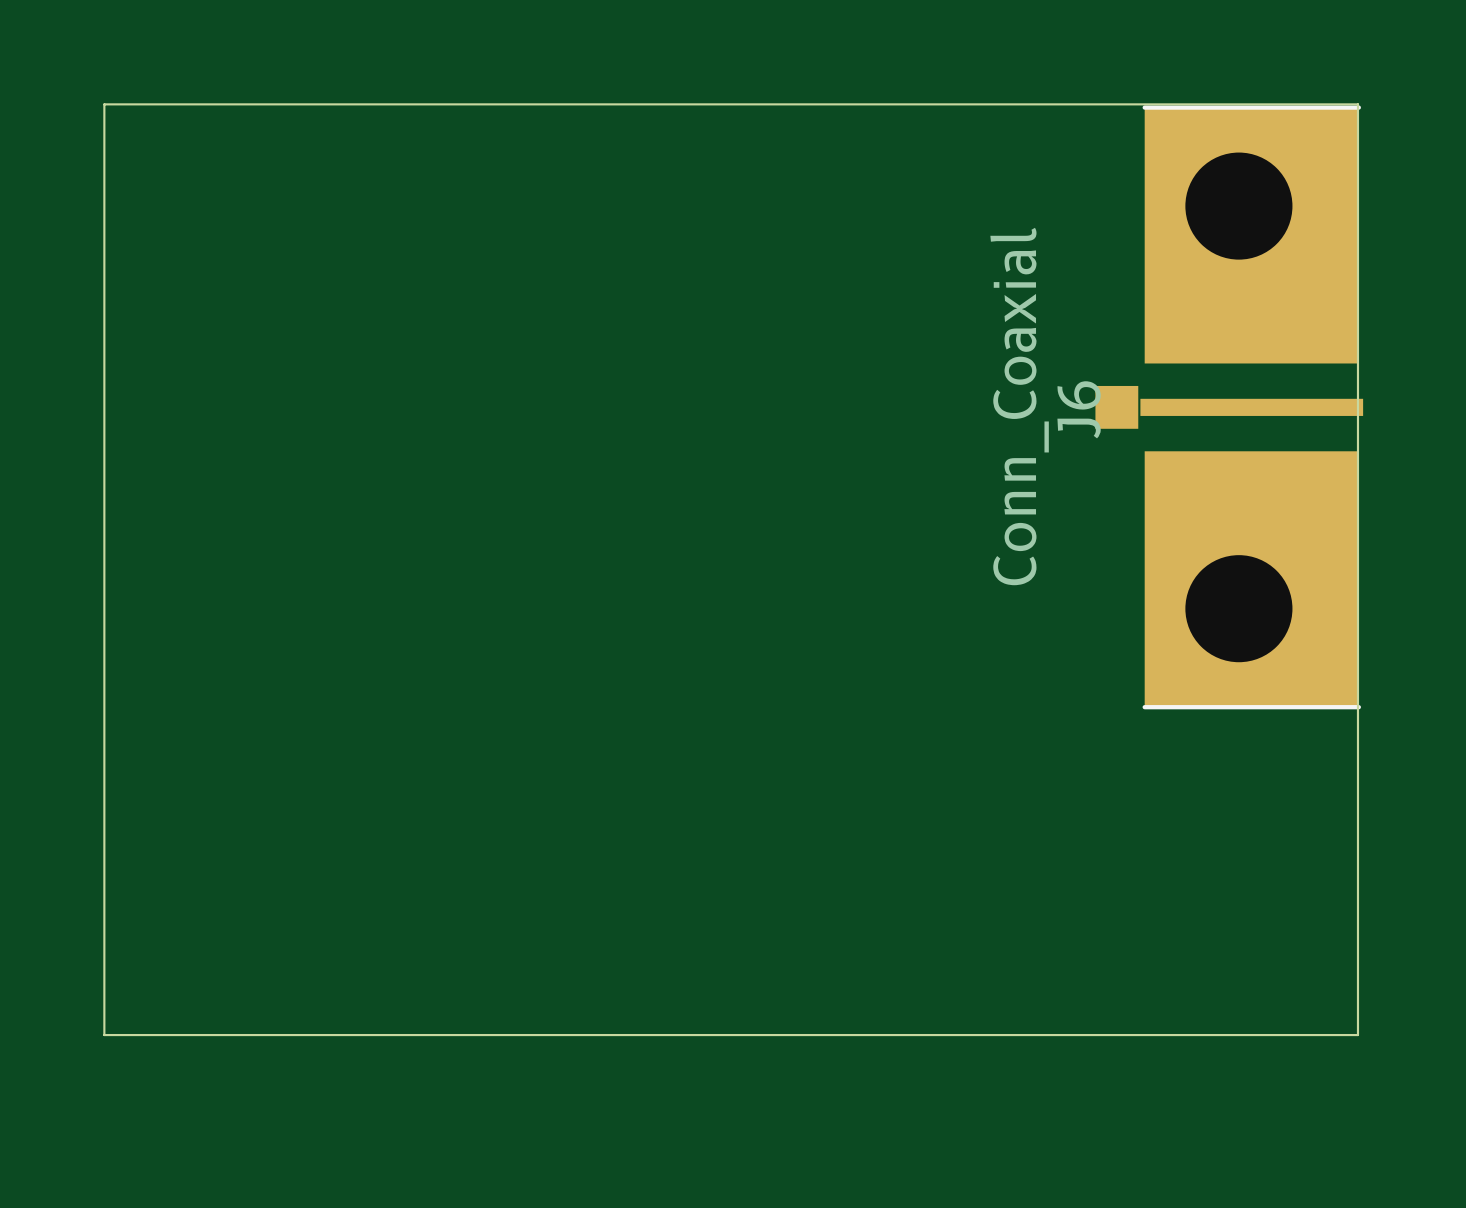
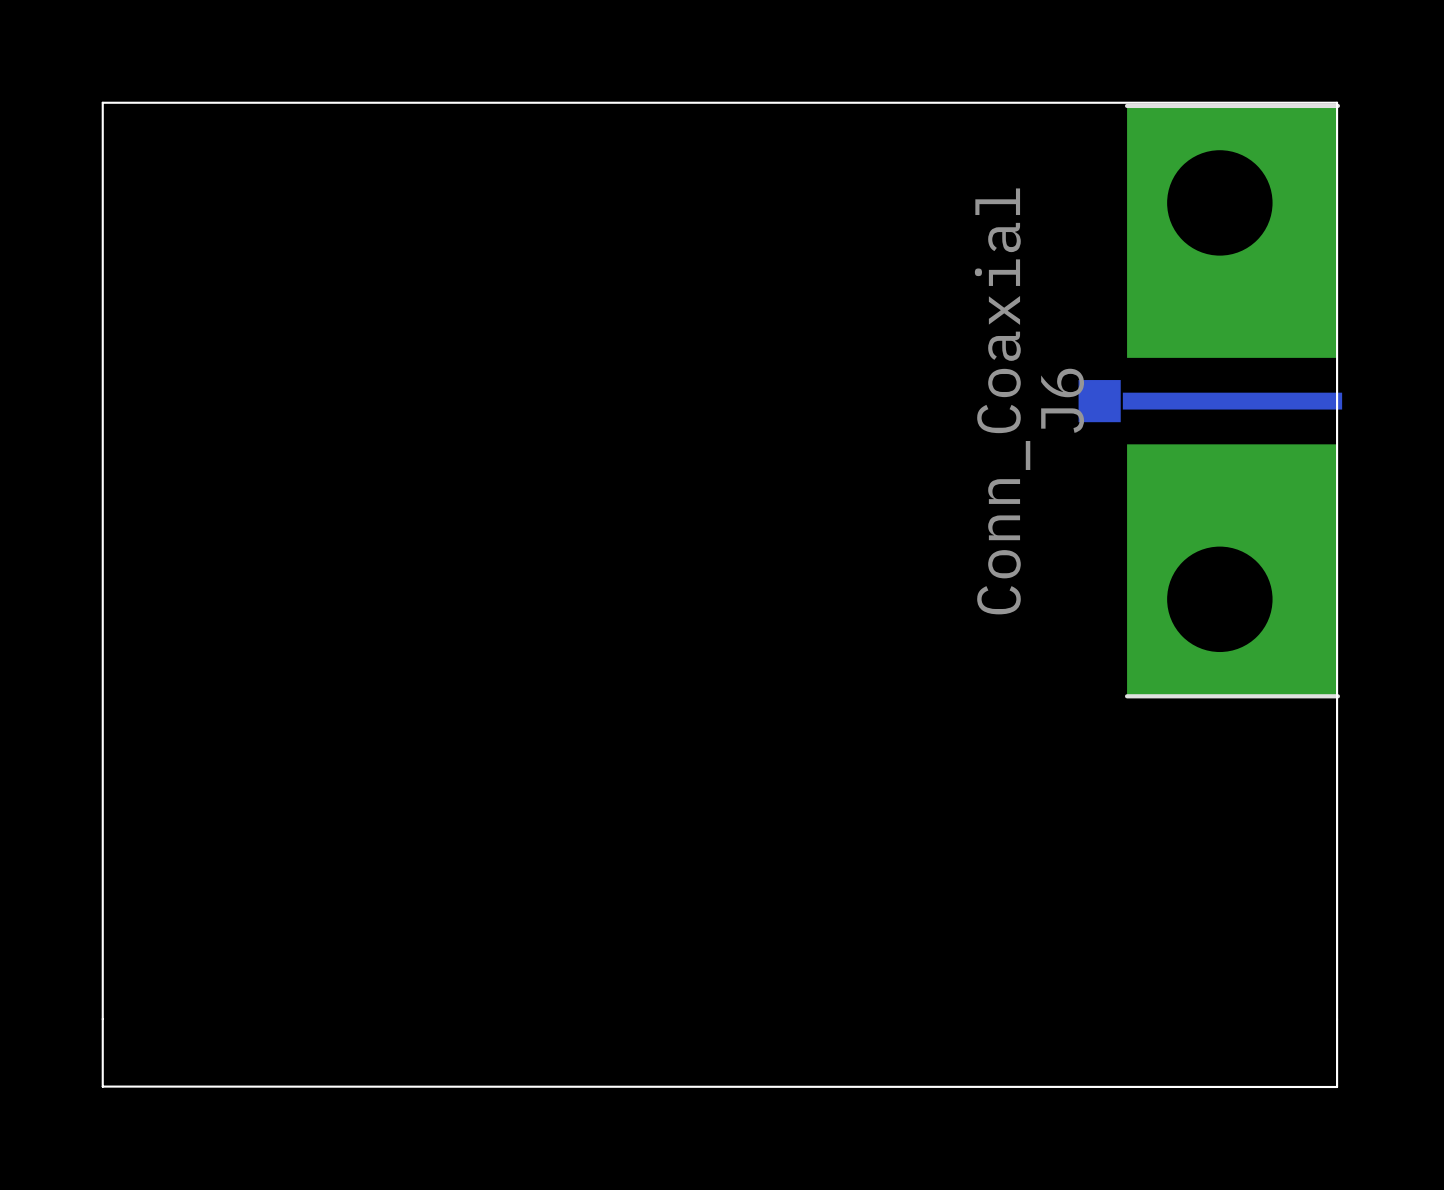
board edge: (1357, 1035) (104, 1035) -> (1337, 1019) (1337, 1087) (102, 1086) (102, 1019)

